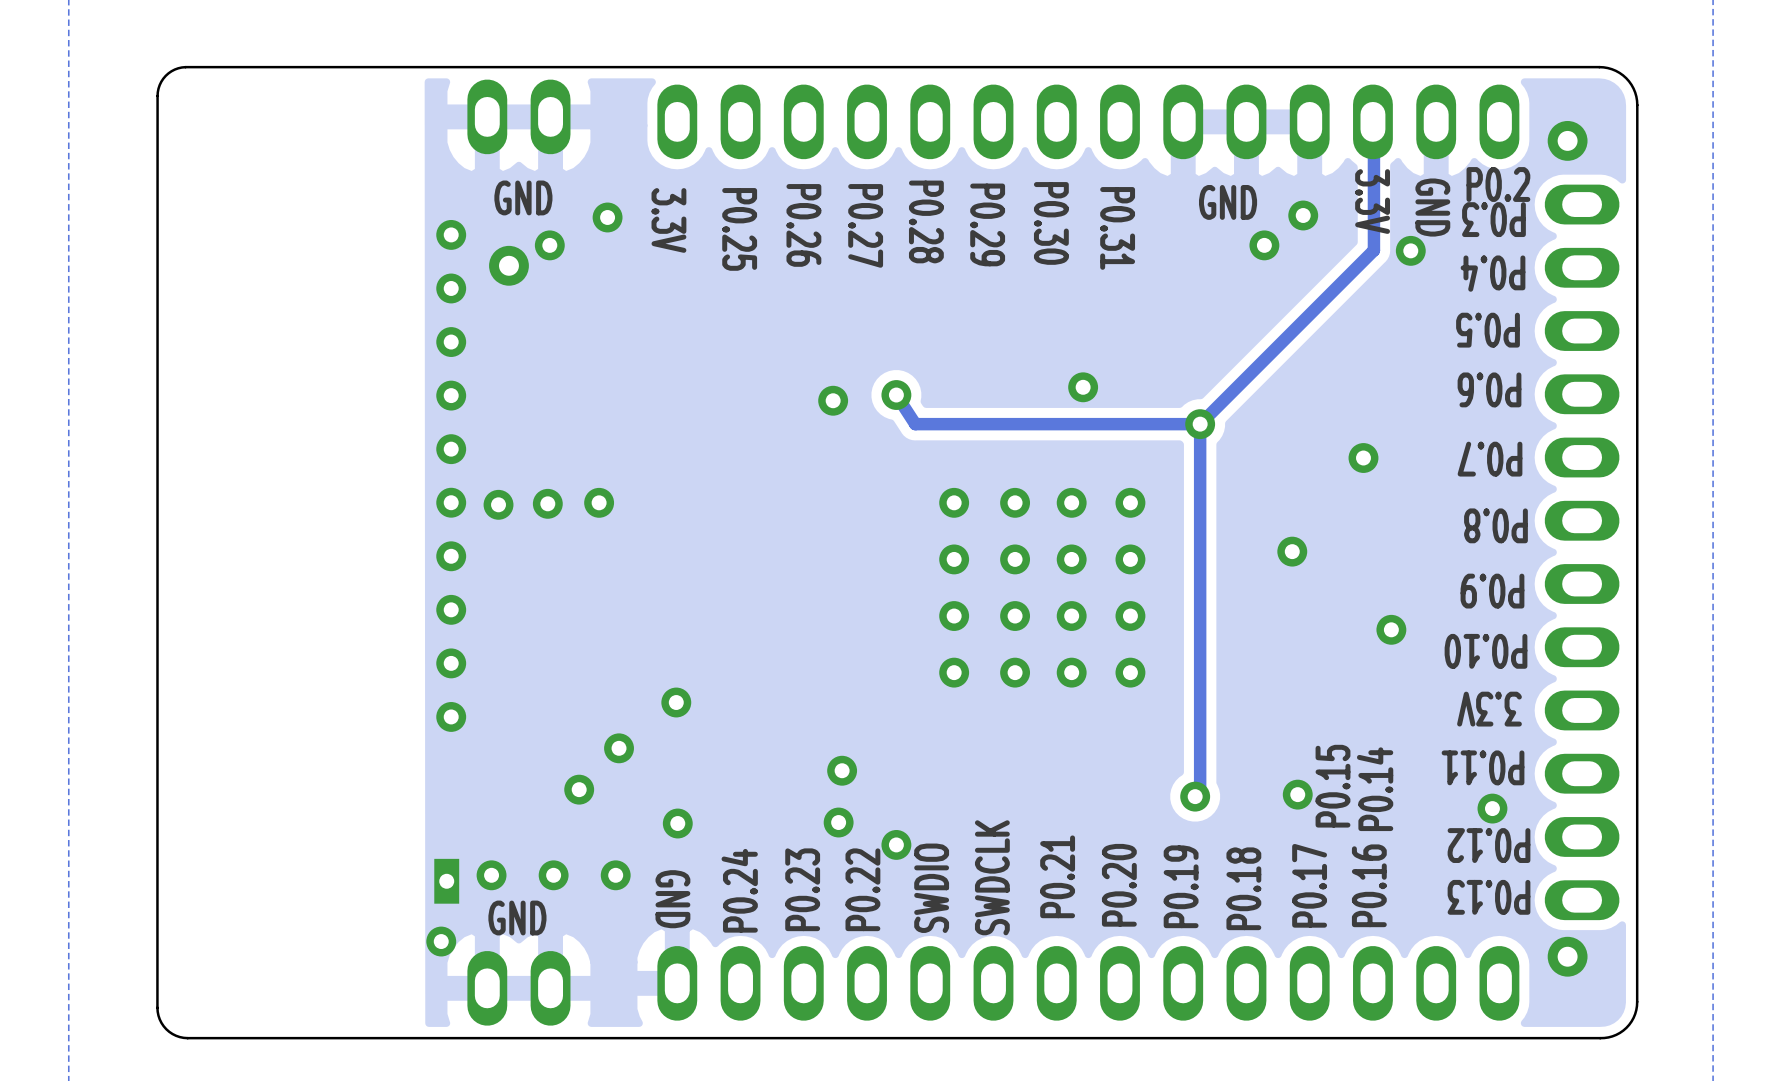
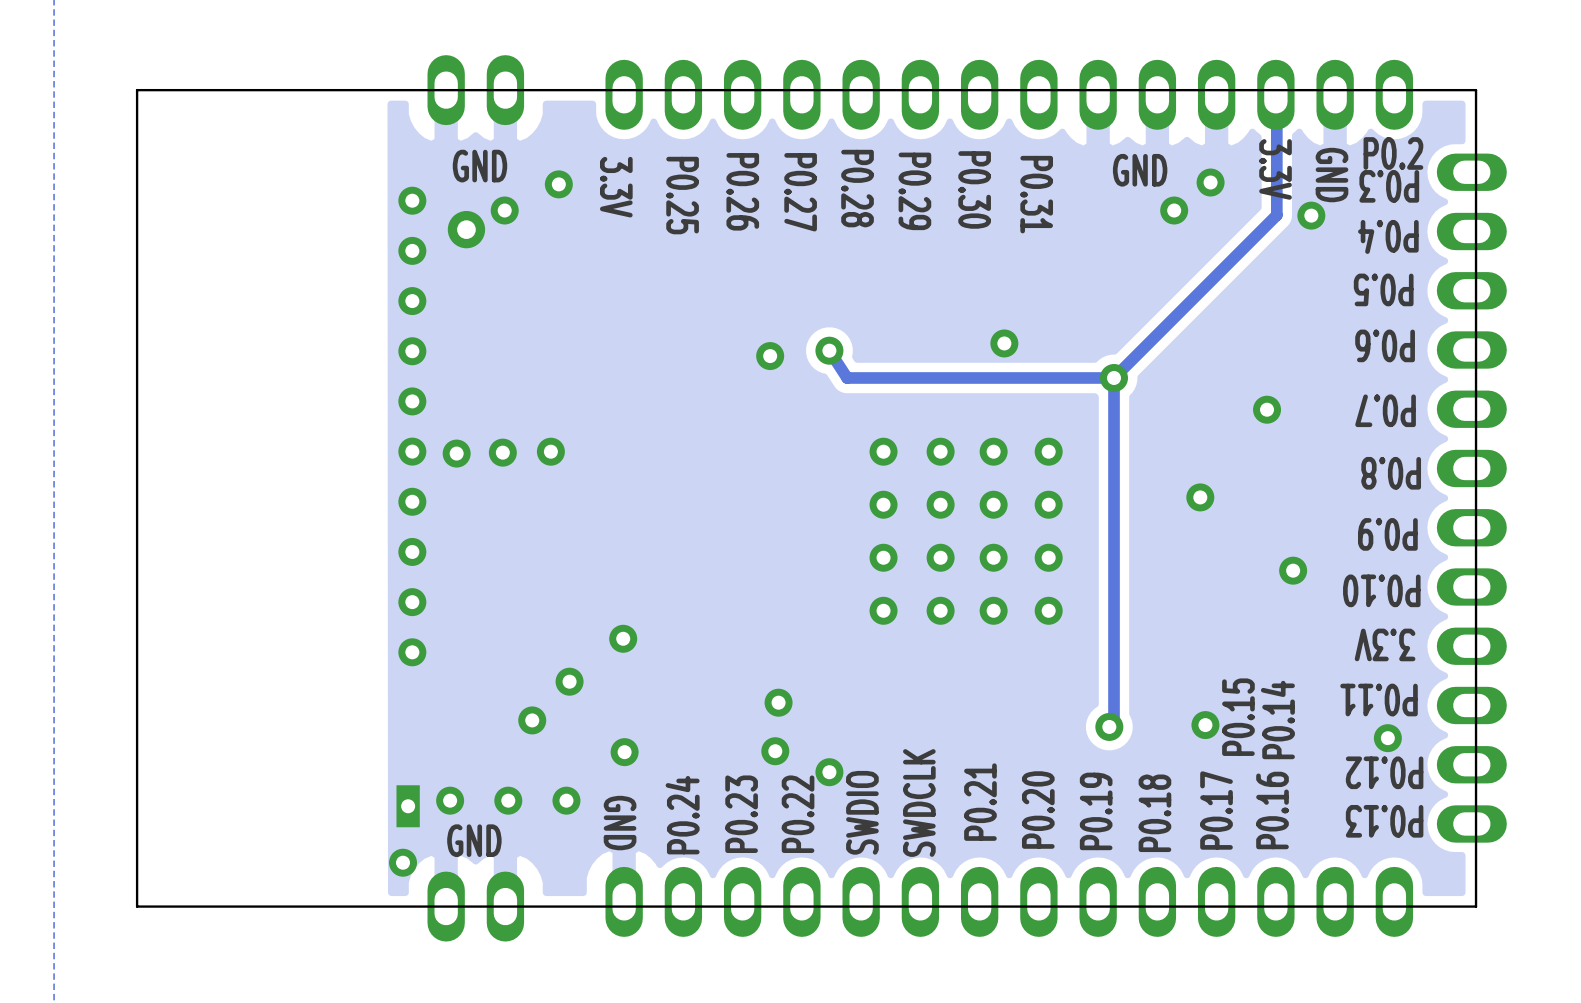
board edge: (1599, 67) (185, 67) (171, 71) (161, 81) (157, 95) (157, 1007) (158, 1015) (163, 1026) (172, 1034) (187, 1038) (1600, 1038) (1619, 1032) (1633, 1017) (1637, 1001) (1637, 105) (1635, 92) (1626, 78) (1611, 69) (1599, 67) -> (1476, 90) (1476, 906) (137, 906) (137, 90) (1476, 90)
via: (1567, 140) -> none
via: (1567, 956) -> none

